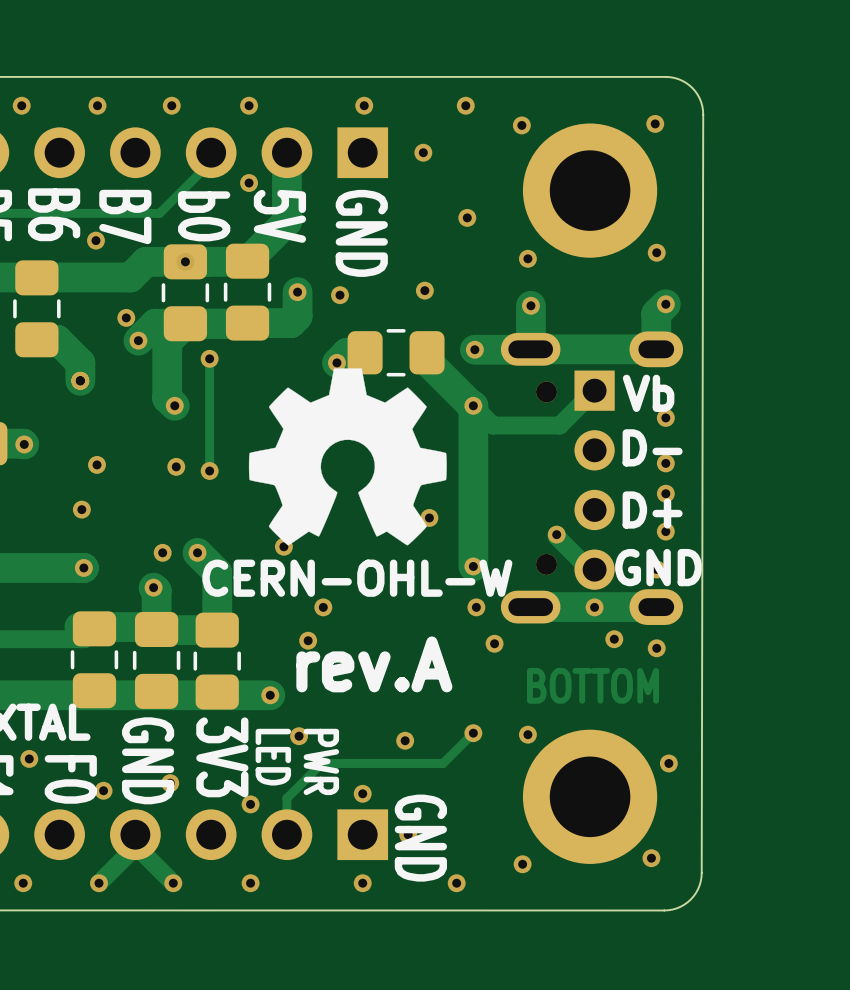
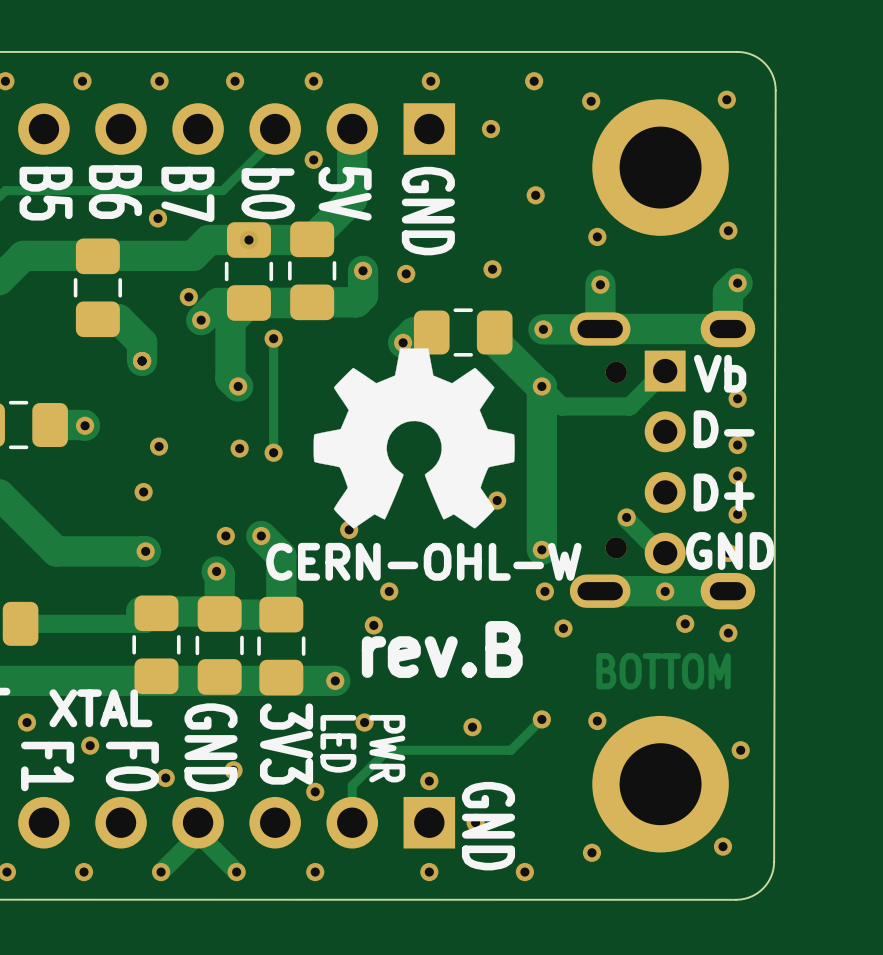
text: rev.A (374, 664) -> rev.B (442, 649)

